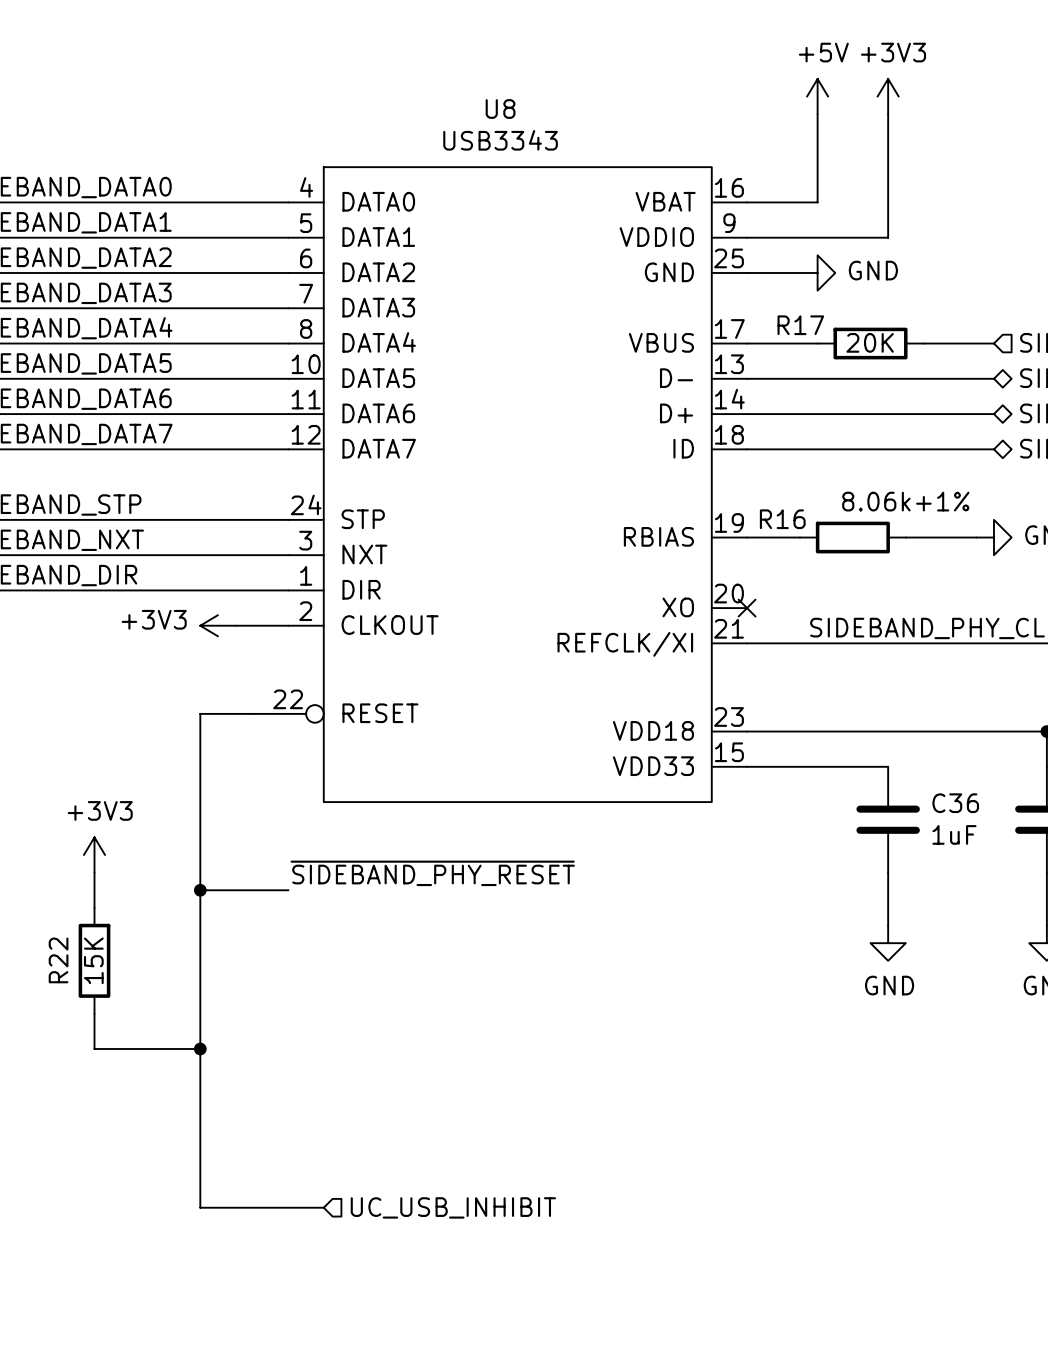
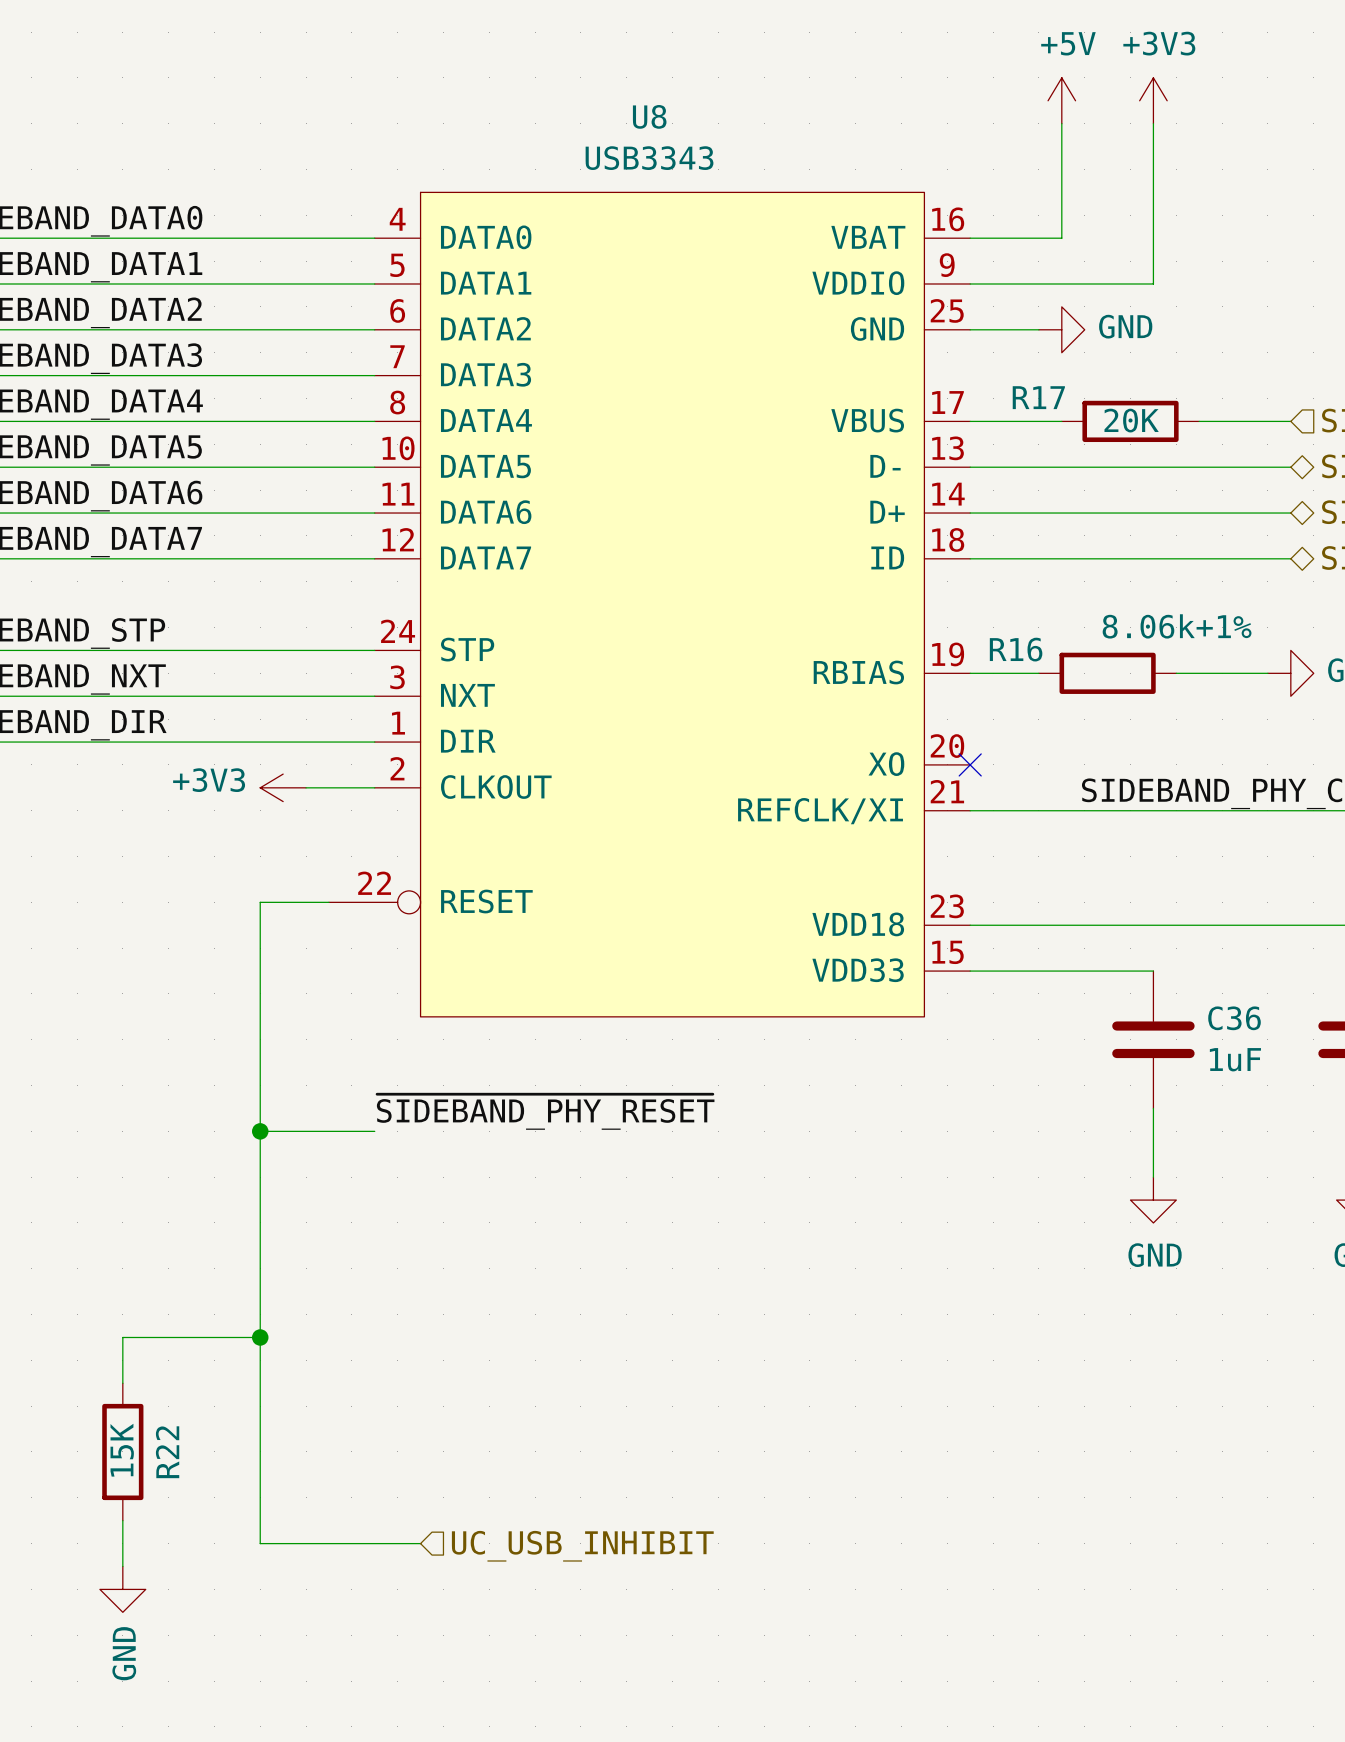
power symbol: +3V3 (94, 855) -> none
wire: (94, 872) (94, 907) -> (122, 1520) (122, 1566)
R22 name position: R22 (58, 960) -> R22 (167, 1452)
R22 position: (94, 960) -> (122, 1451)
wire: (94, 1013) (94, 1049) -> (122, 1383) (122, 1337)
power symbol: none -> GND (122, 1589)

